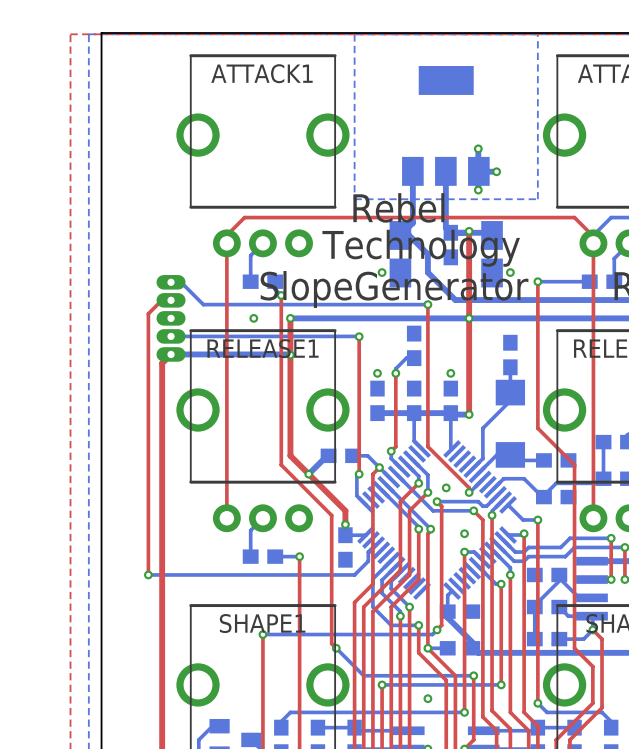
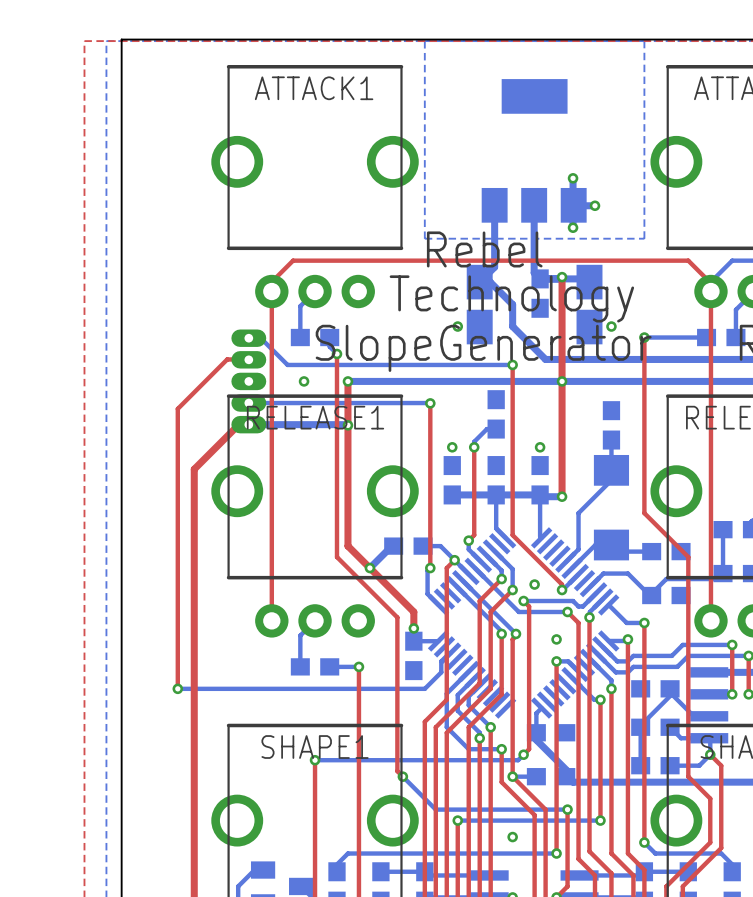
bottom track: (171, 282) (181, 282) (203, 304) (240, 304) -> (248, 338) (260, 338) (287, 364)
top track: (171, 300) (161, 300) (148, 313) (148, 341) -> (248, 359) (227, 359) (177, 408)
part position: (171, 318) -> (248, 381)
bottom track: (171, 336) (207, 336) -> none
bottom track: (171, 354) (207, 354) -> none
top track: (171, 354) (162, 363) (162, 391) -> (248, 424) (238, 424) (194, 469)

